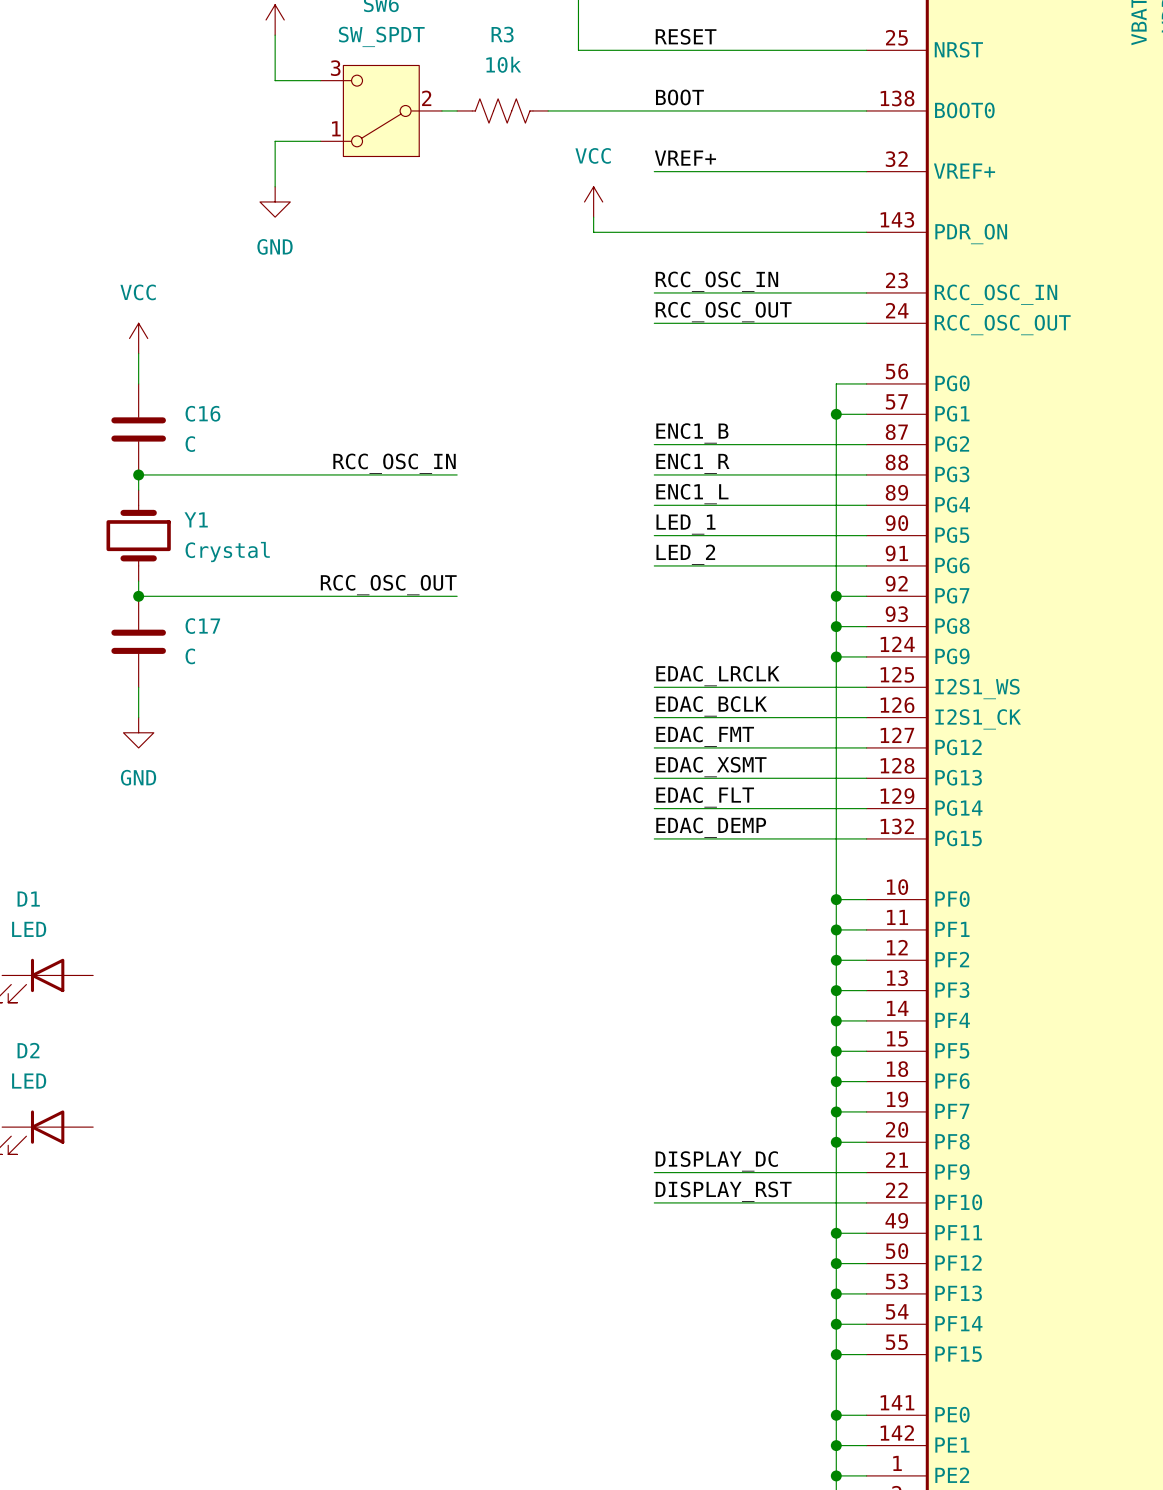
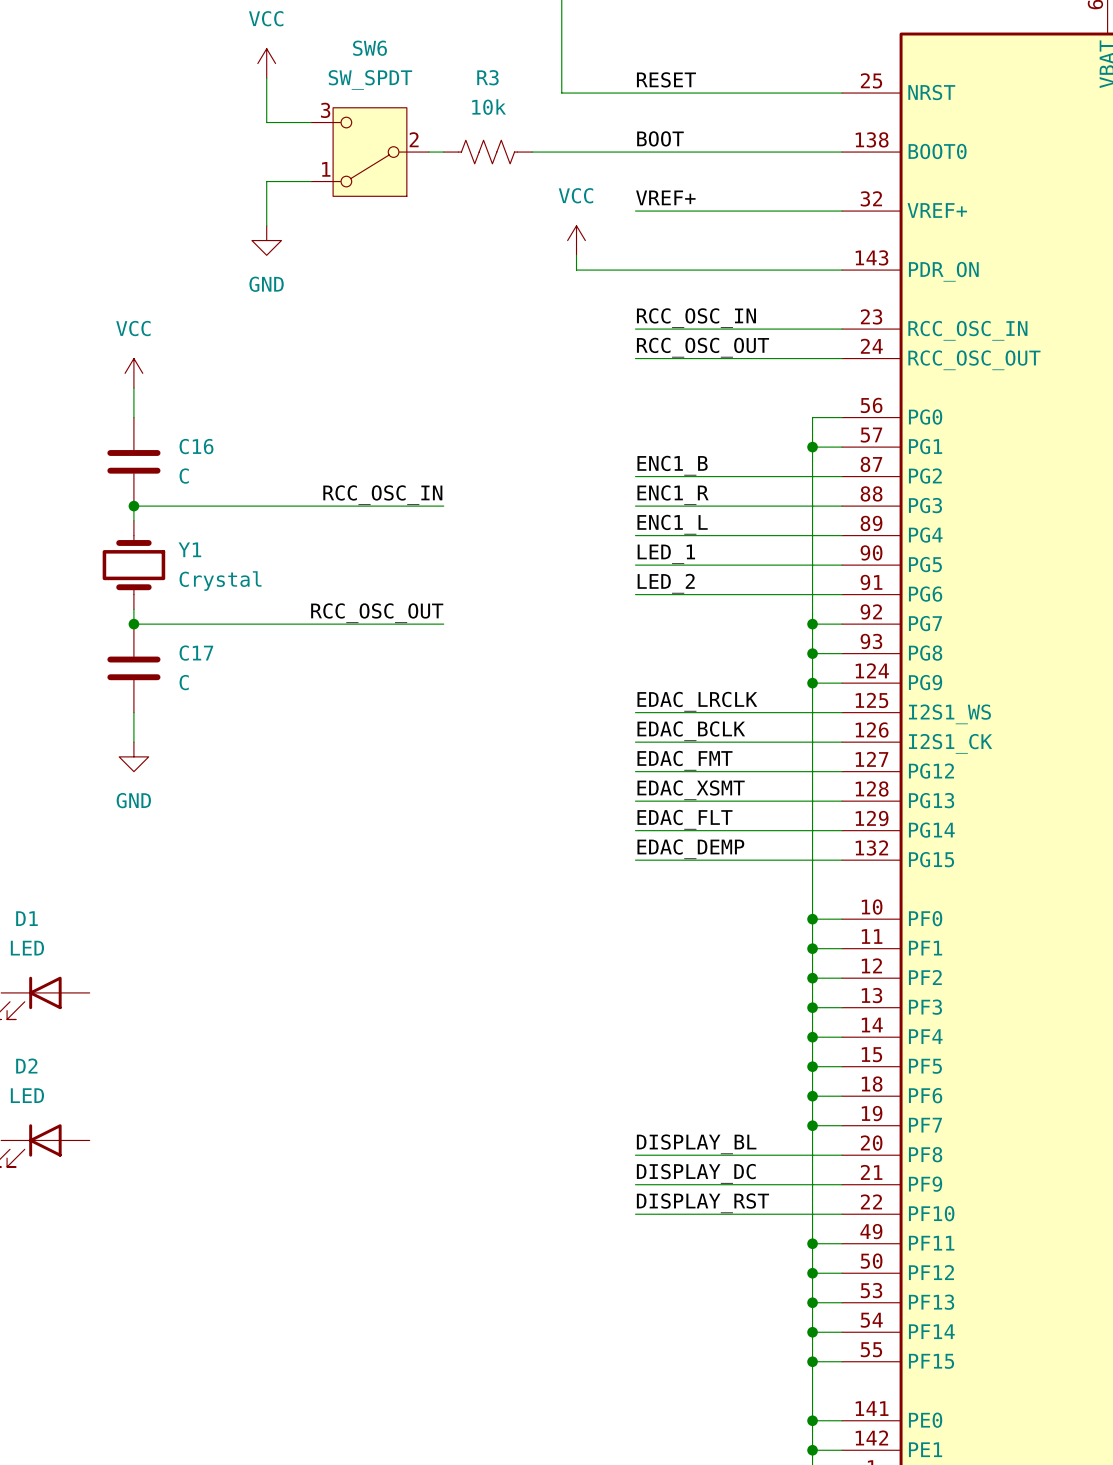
label: none -> DISPLAY_BL (696, 1144)
wire: none -> (635, 1155) (812, 1155)
junction: (836, 1142) -> none

